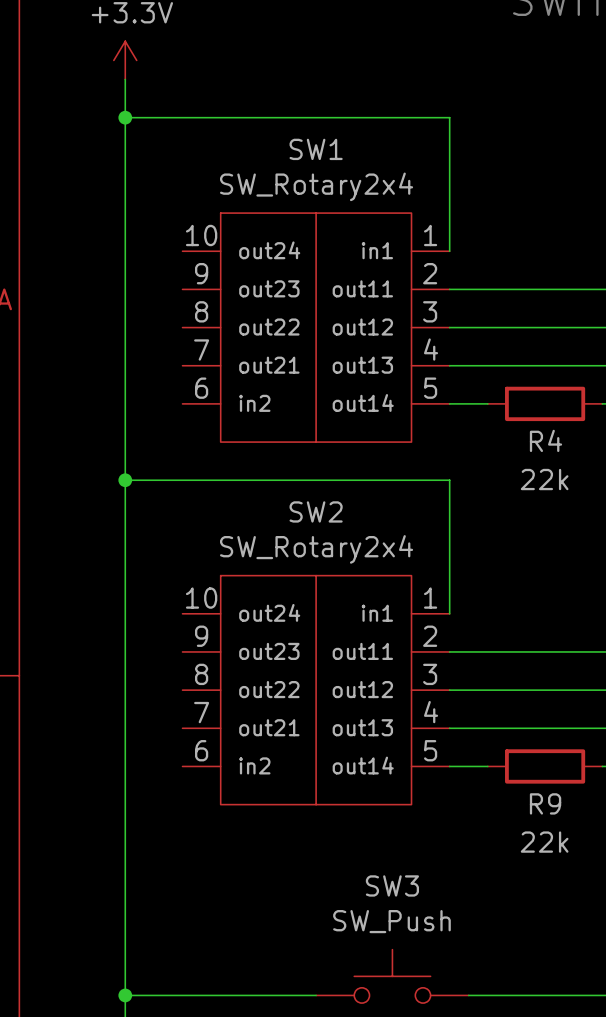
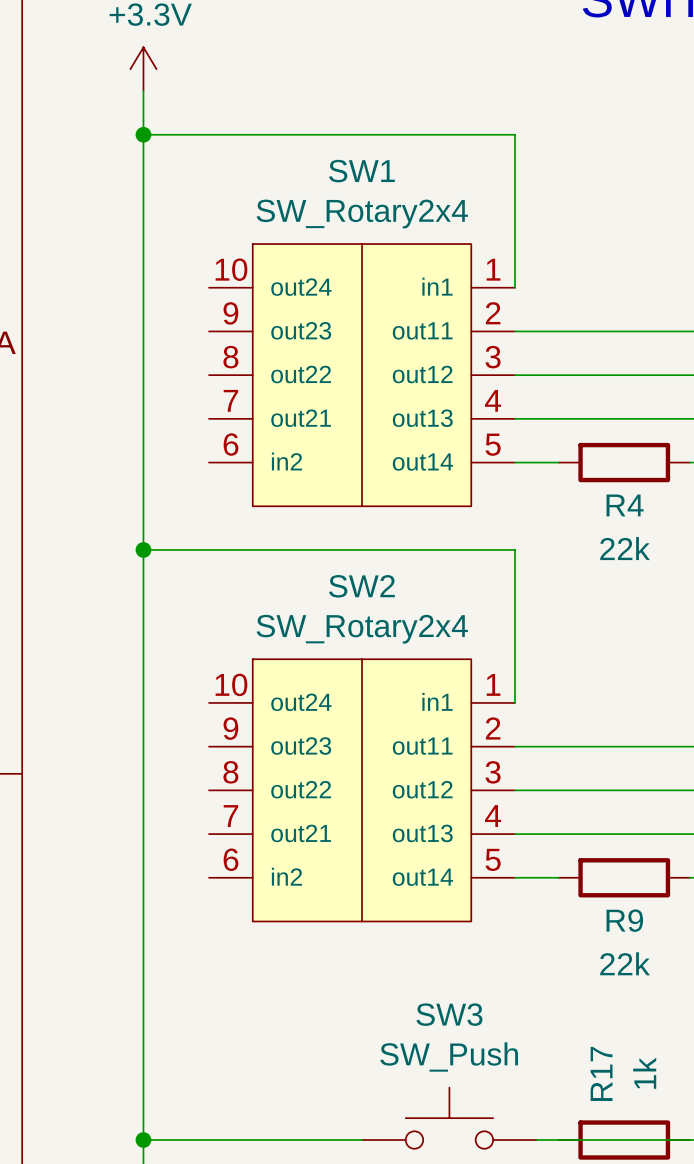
R17: none -> 1k (624, 1140)

